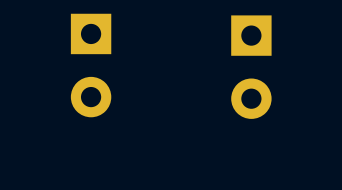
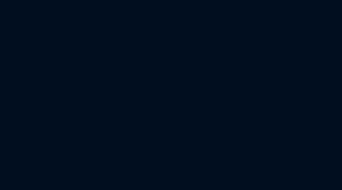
part: (91, 65) -> none
part: (251, 67) -> none

